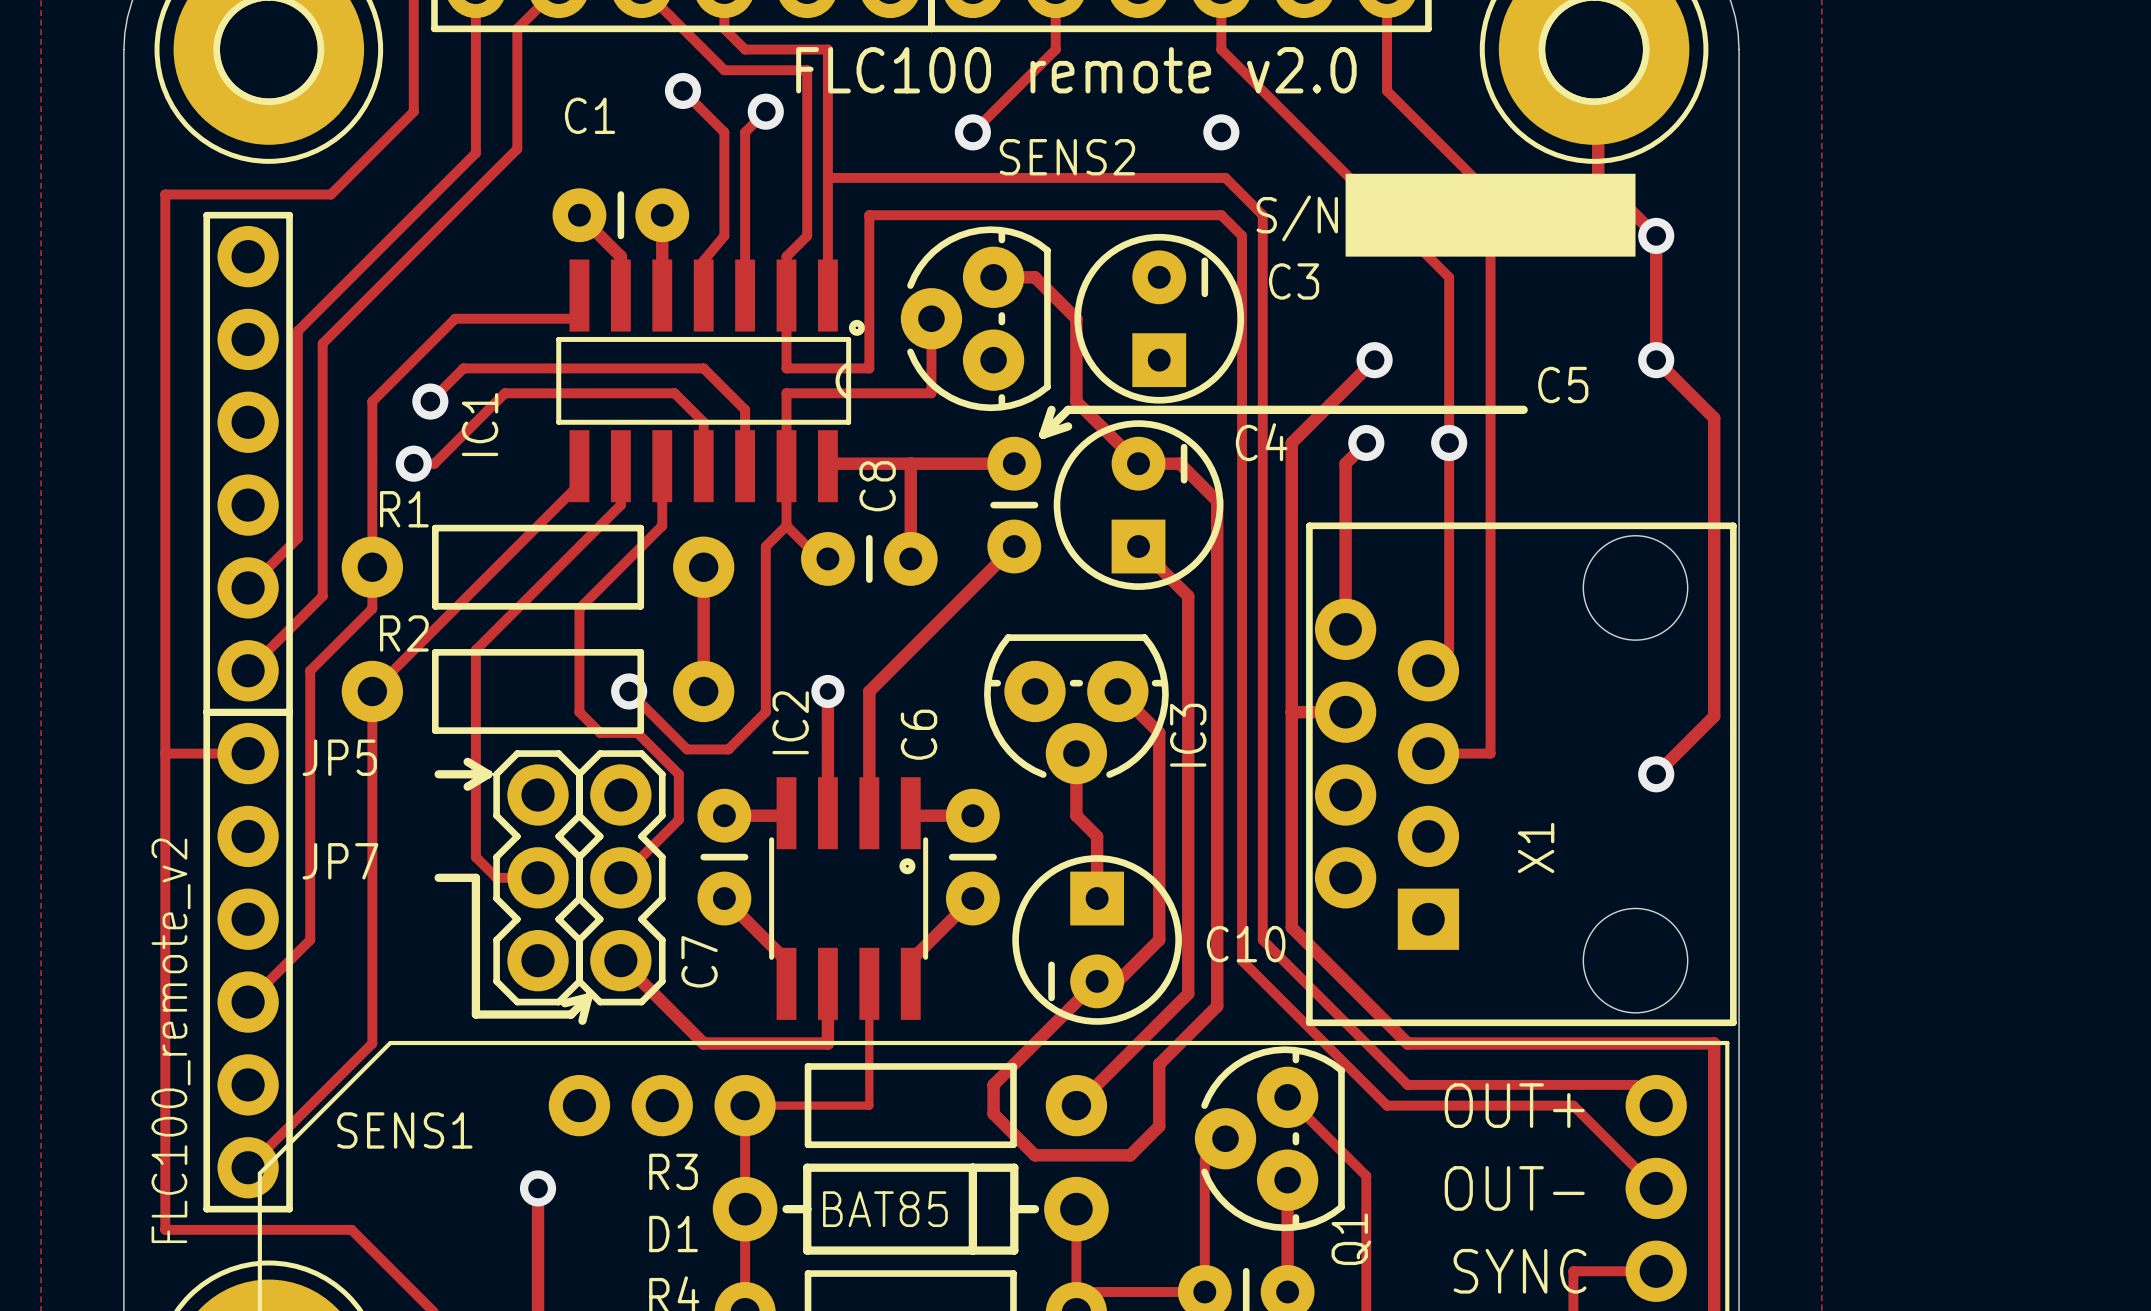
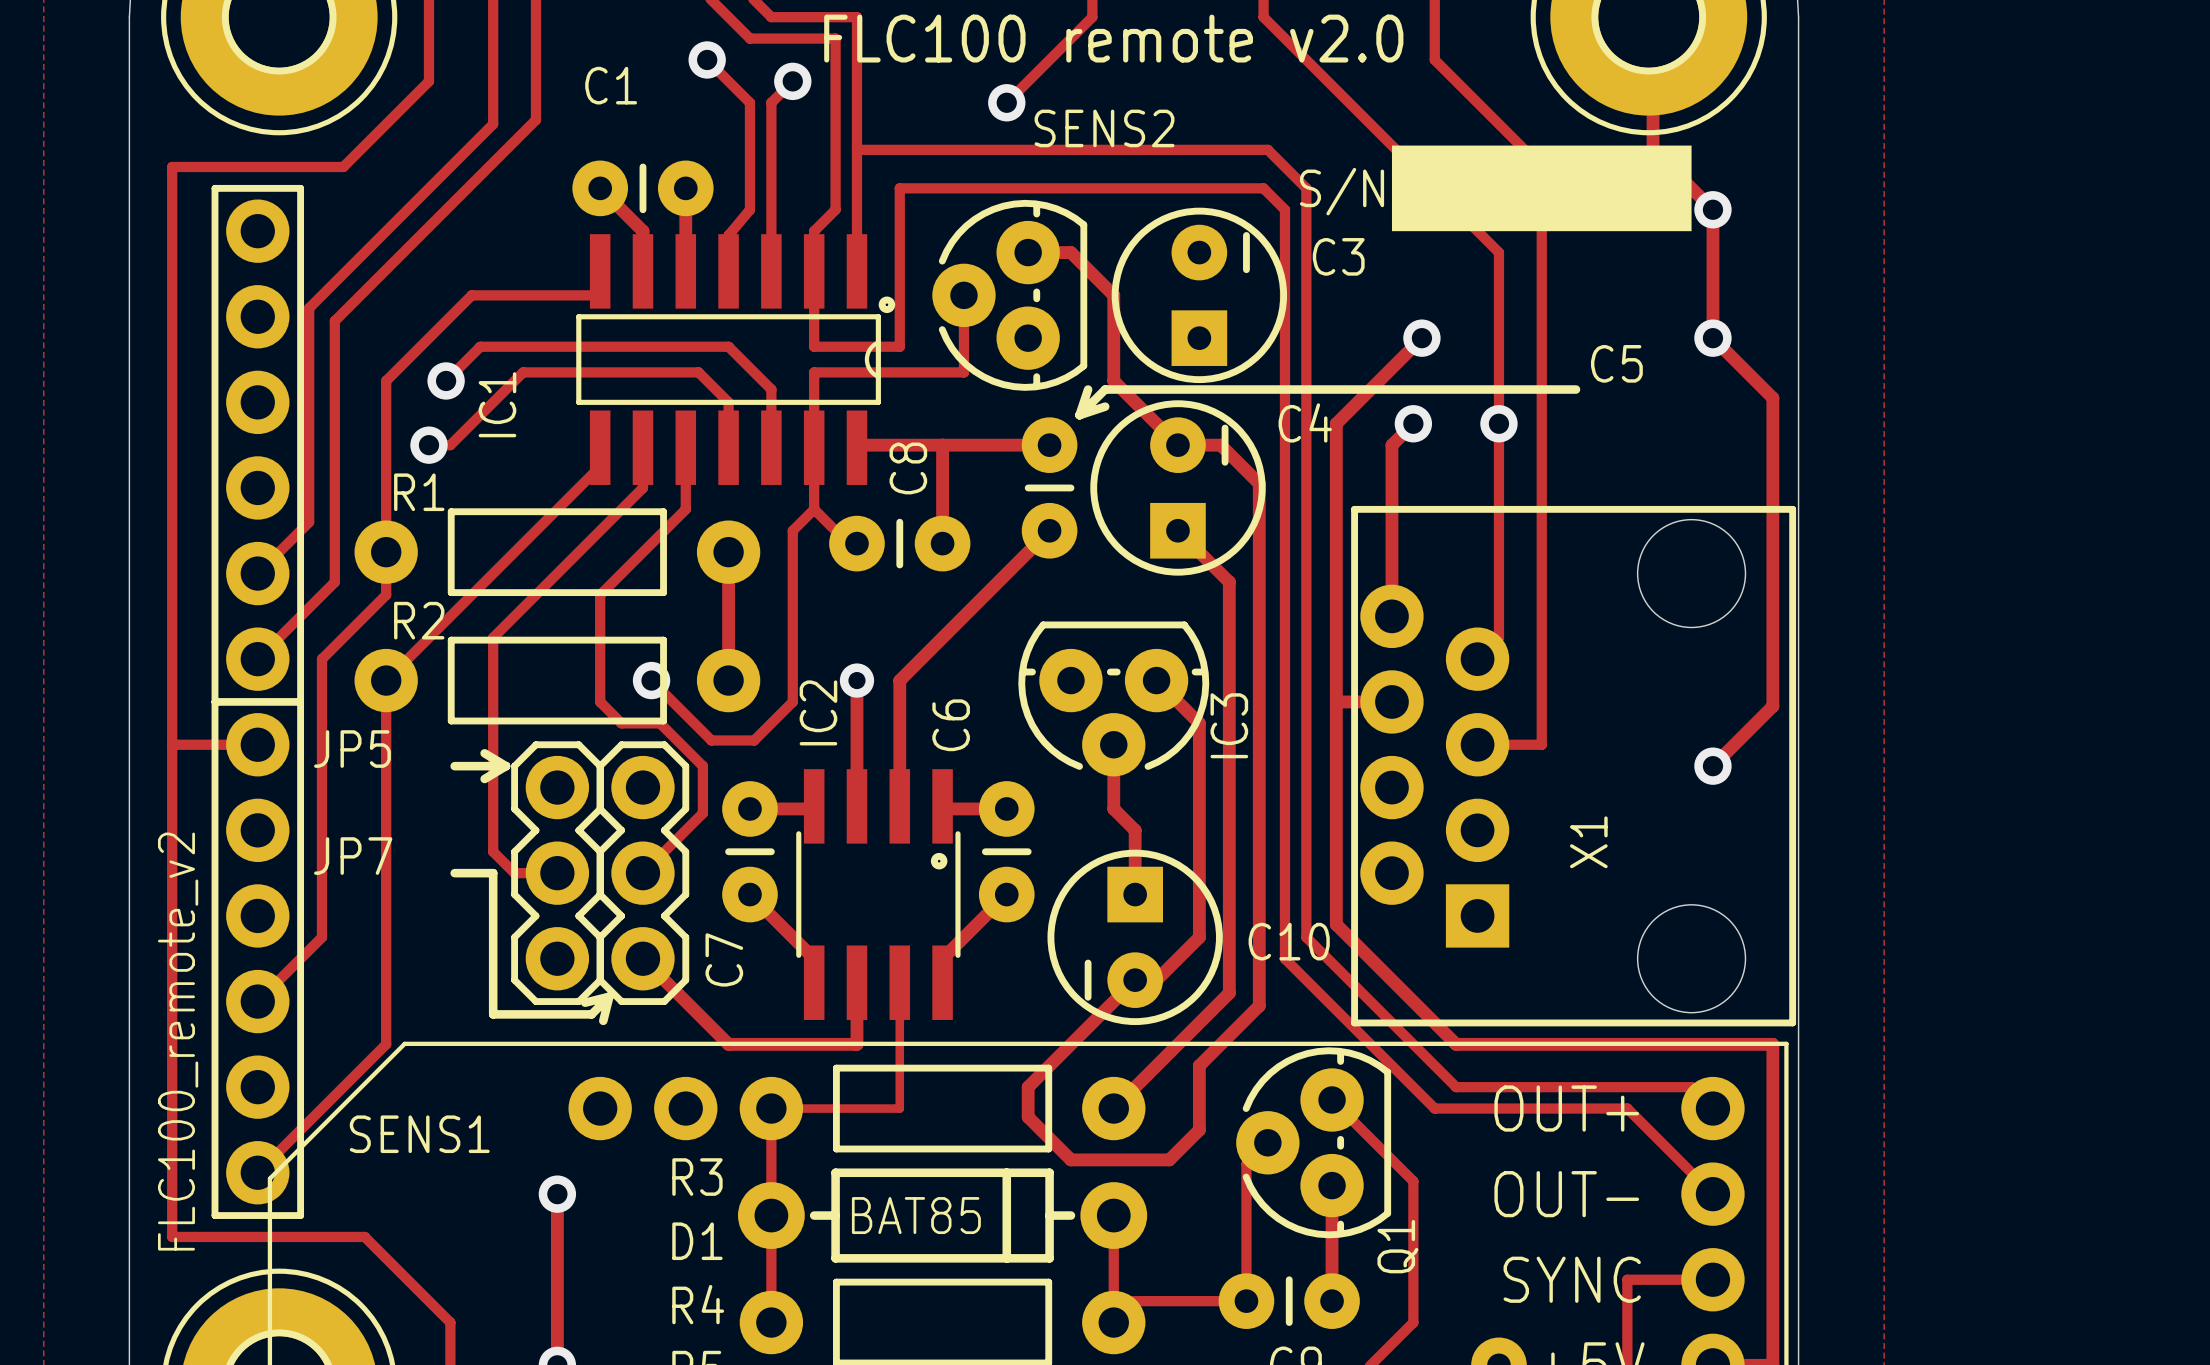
via: (1221, 132) -> none

